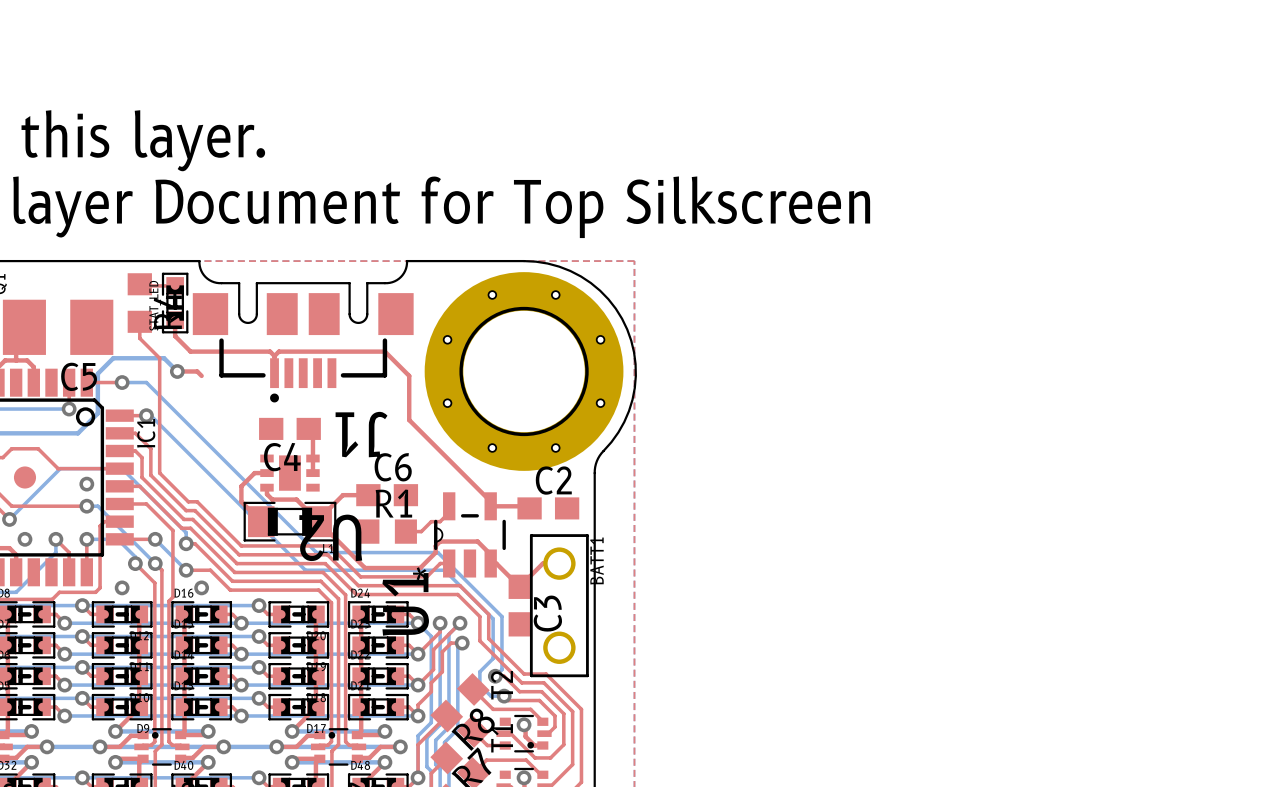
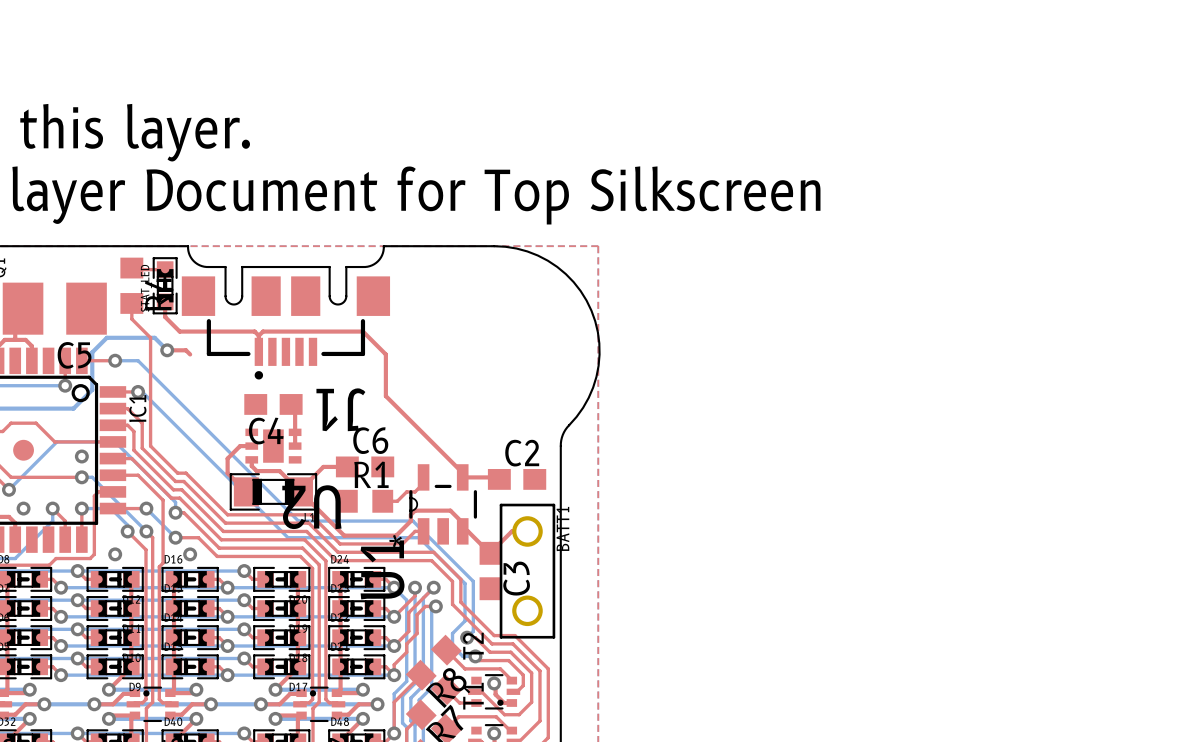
hole: (492, 294) -> none
hole: (555, 294) -> none
hole: (447, 339) -> none
hole: (600, 339) -> none
part: (524, 371) -> none
hole: (447, 403) -> none
hole: (600, 403) -> none
hole: (492, 448) -> none
hole: (555, 448) -> none

